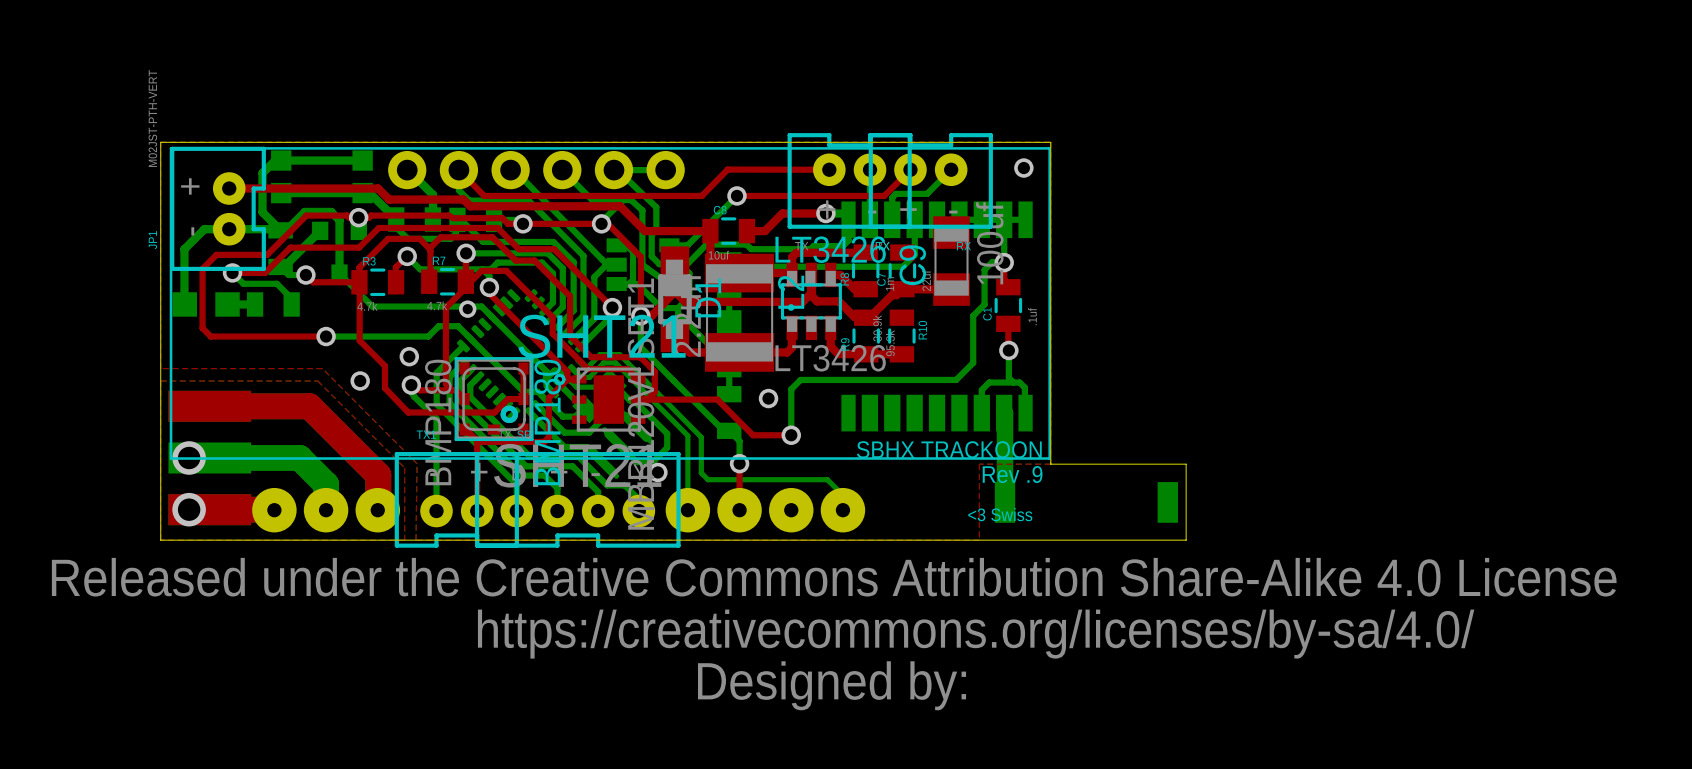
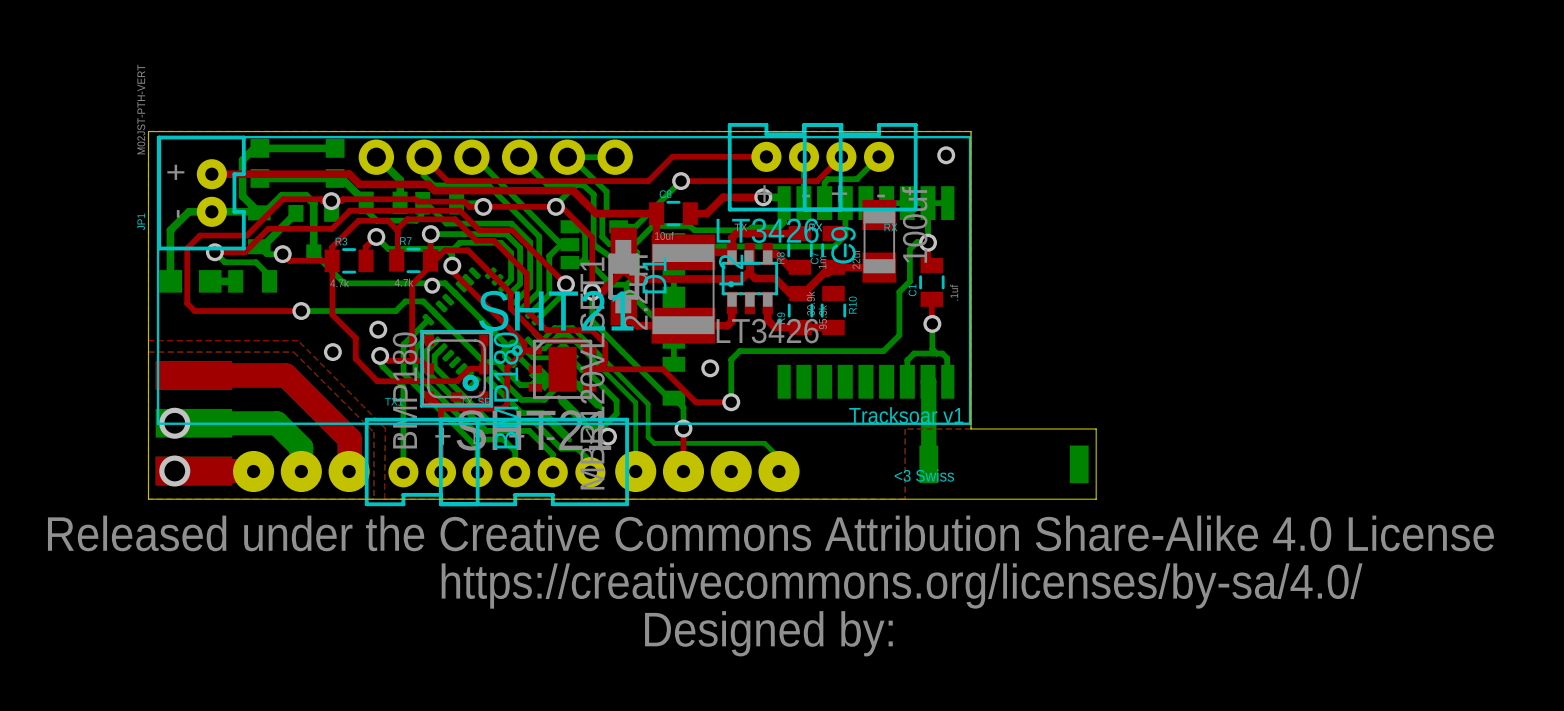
text: SBHX TRACKOON (949, 449) -> Tracksoar v1 (906, 415)
text: Rev .9 (1012, 474) -> none

